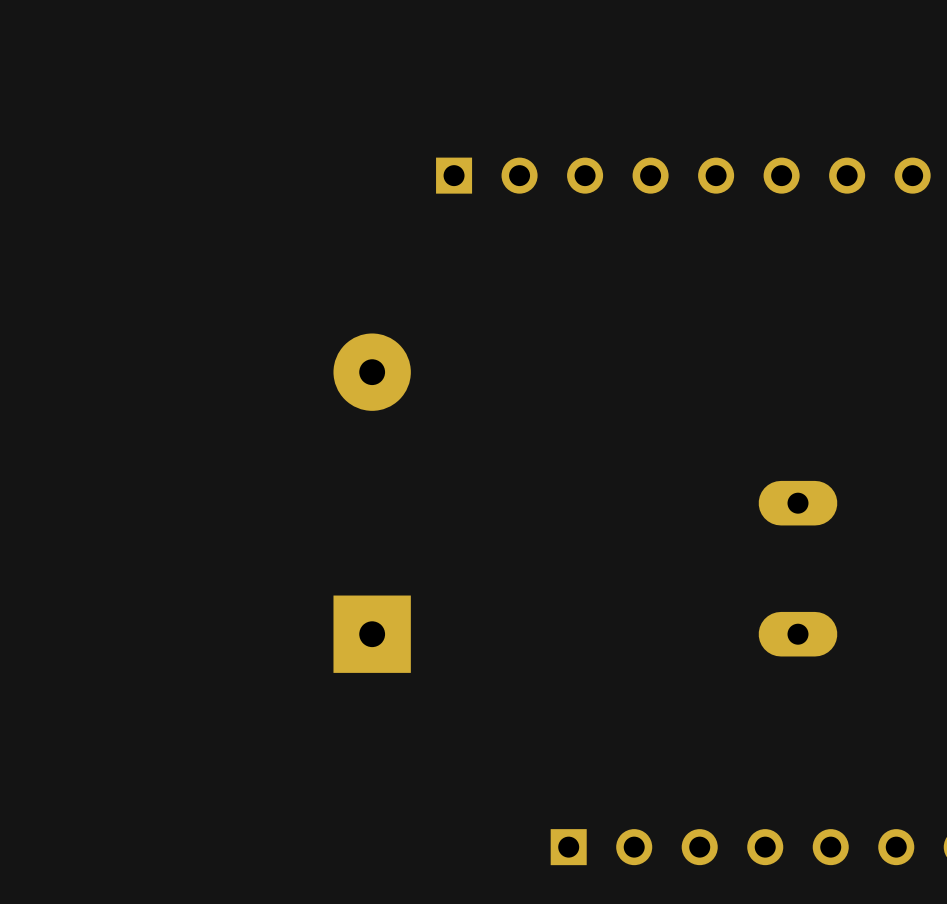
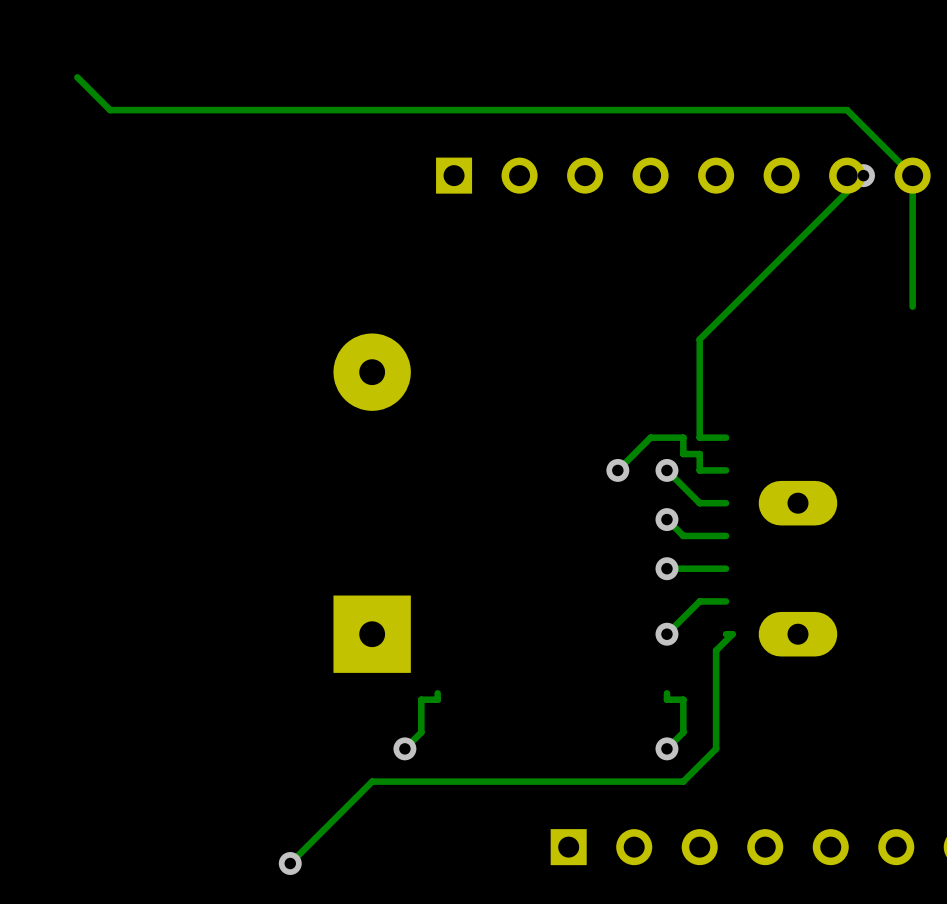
track: none -> (77, 77) (110, 110) (847, 110) (912, 175) (912, 306)
track: none -> (863, 175) (699, 339) (699, 437) (726, 437)
via: none -> (863, 175)
via: none -> (617, 470)
track: none -> (666, 470) (699, 503) (726, 503)
via: none -> (666, 470)
track: none -> (726, 470) (699, 470) (699, 454) (683, 454) (683, 437) (650, 437) (617, 470)
track: none -> (666, 519) (683, 535) (726, 535)
via: none -> (666, 519)
via: none -> (666, 568)
track: none -> (726, 568) (666, 568)
track: none -> (726, 601) (699, 601) (666, 634)
via: none -> (666, 634)
track: none -> (726, 634) (732, 634) (716, 650) (716, 748) (683, 781) (372, 781) (290, 863)
track: none -> (437, 693) (437, 699) (421, 699) (421, 732) (404, 748)
track: none -> (666, 693) (666, 699) (683, 699) (683, 732) (666, 748)
via: none -> (404, 748)
via: none -> (666, 748)
via: none -> (290, 863)

